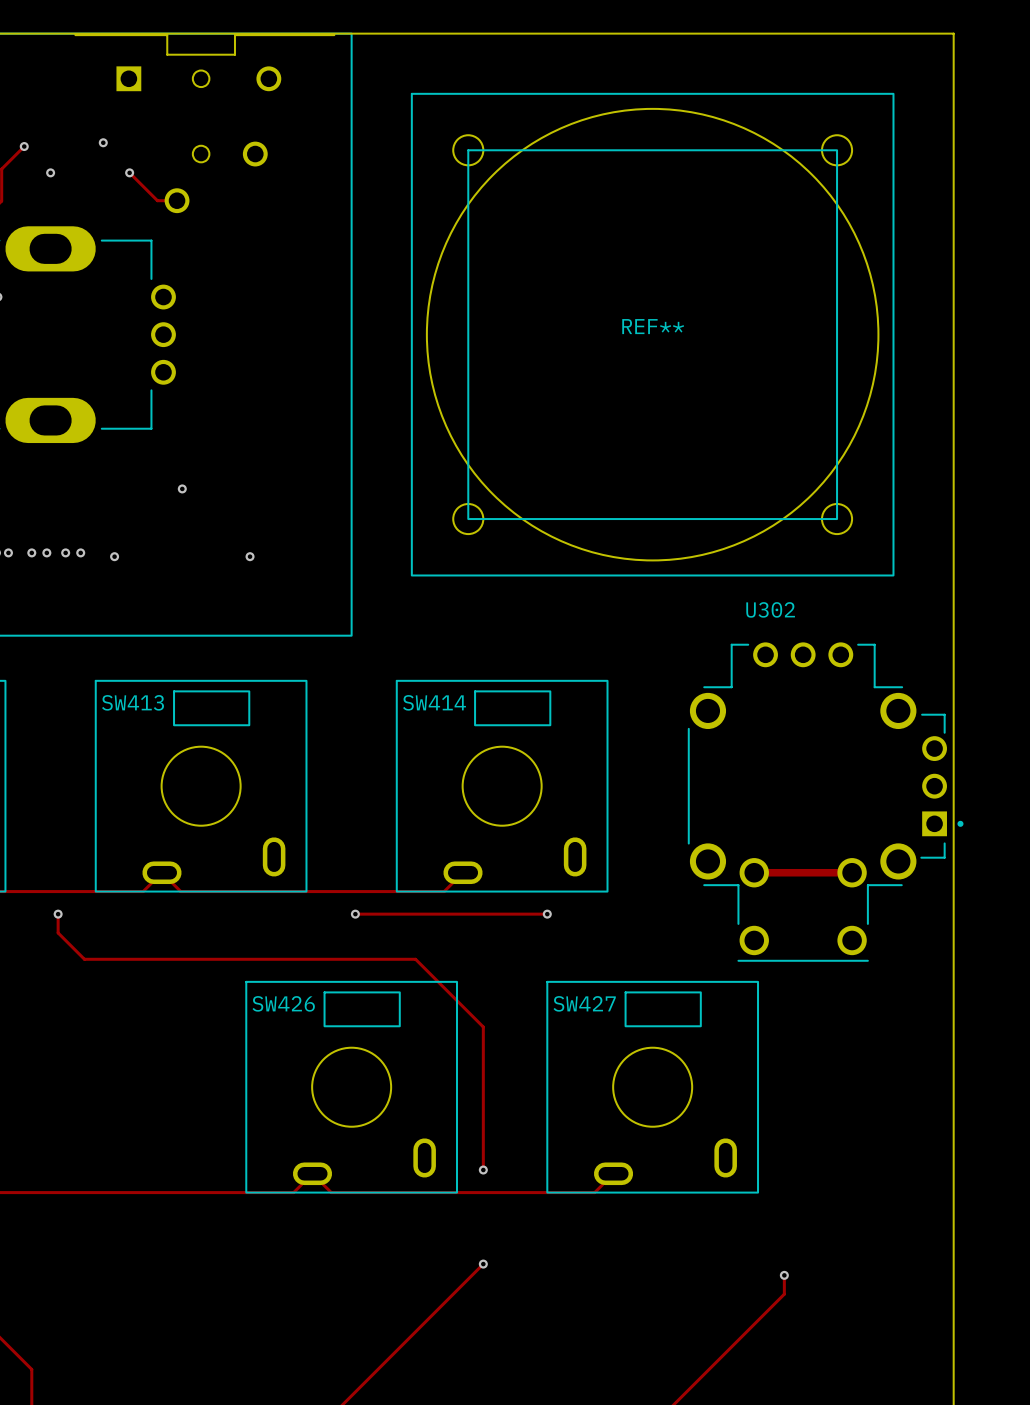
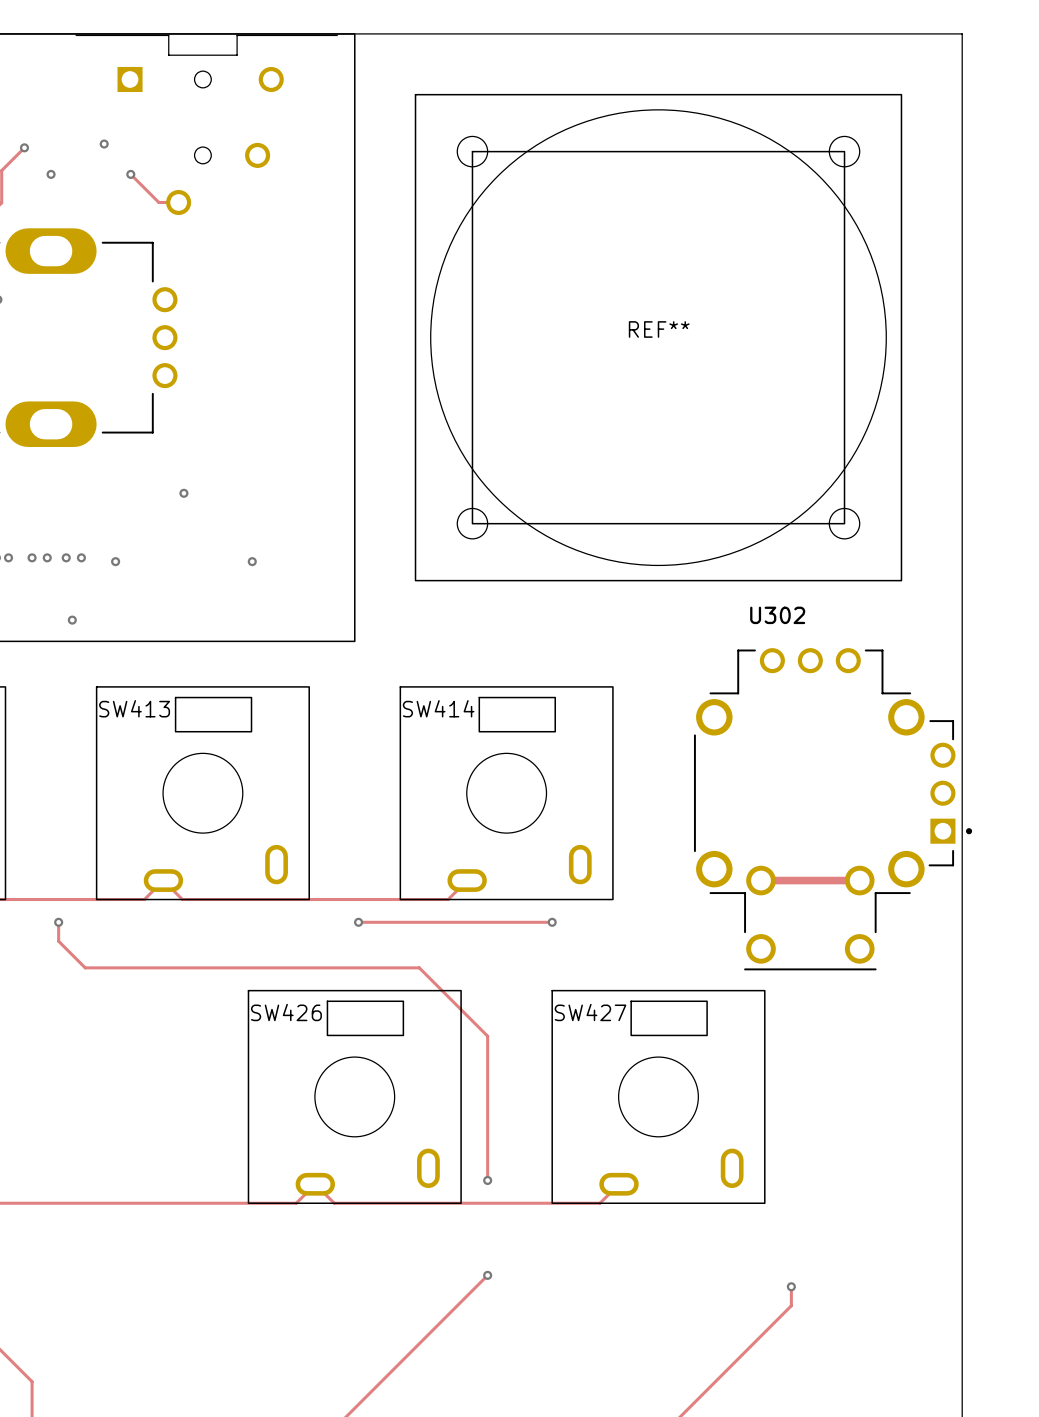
via: none -> (72, 620)

